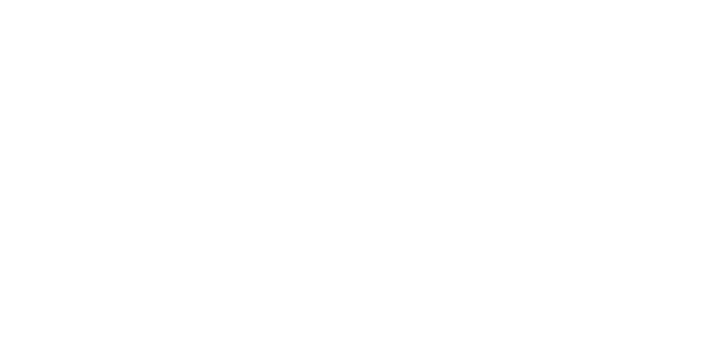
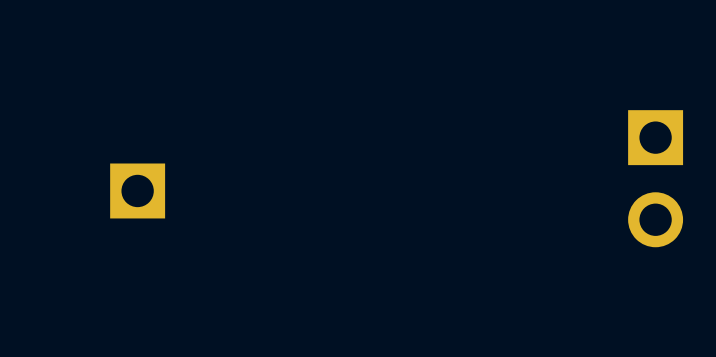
part: none -> (655, 178)
part: none -> (137, 190)

